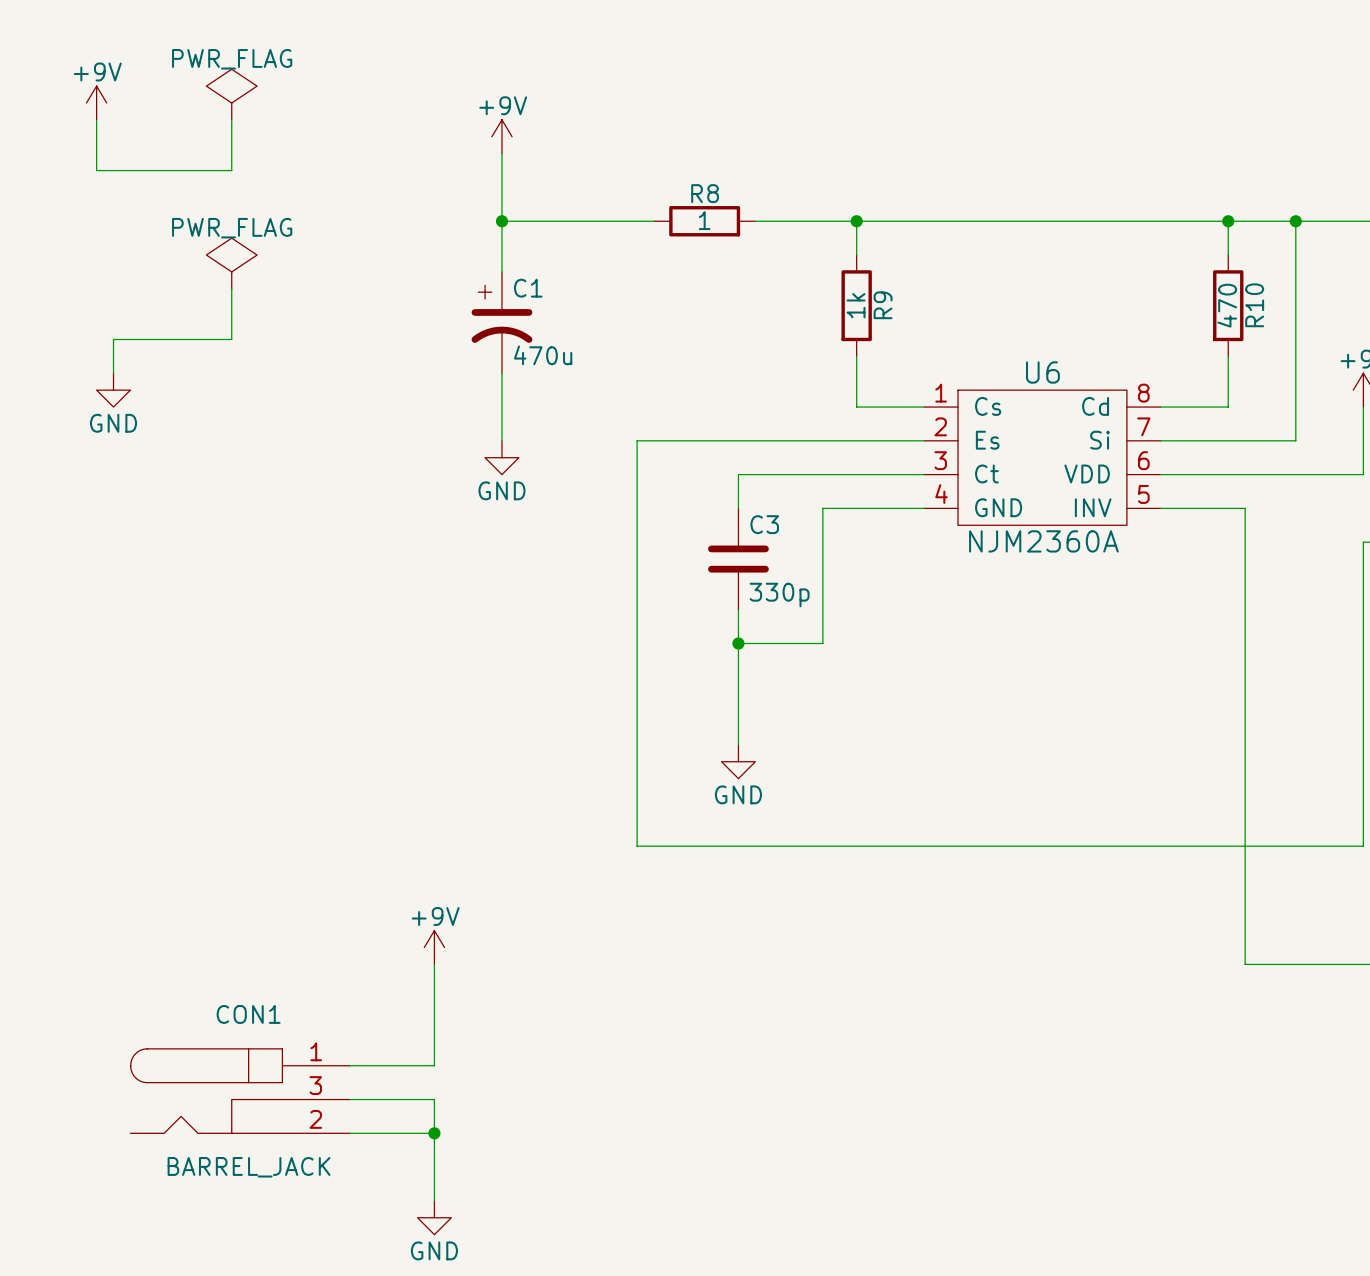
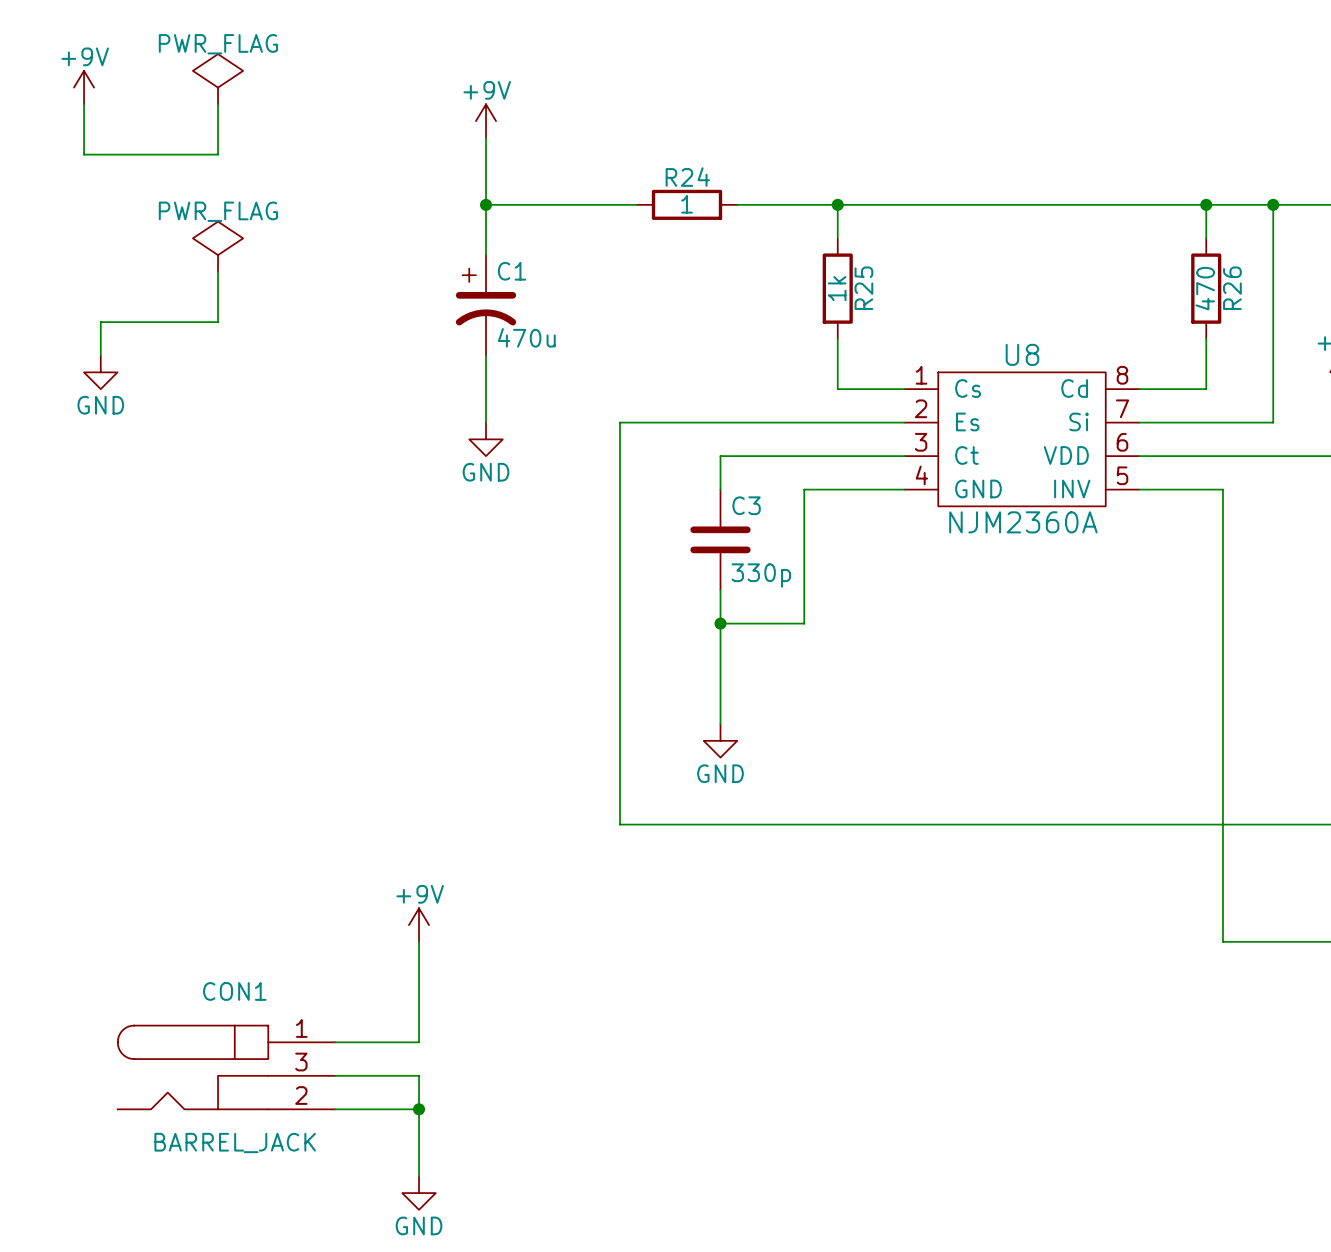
R8 name: R8 (705, 193) -> R24 (687, 177)
R9 name: R9 (883, 305) -> R25 (863, 288)
R10 name: R10 (1254, 305) -> R26 (1232, 288)
U6 name: U6 (1042, 372) -> U8 (1022, 354)

